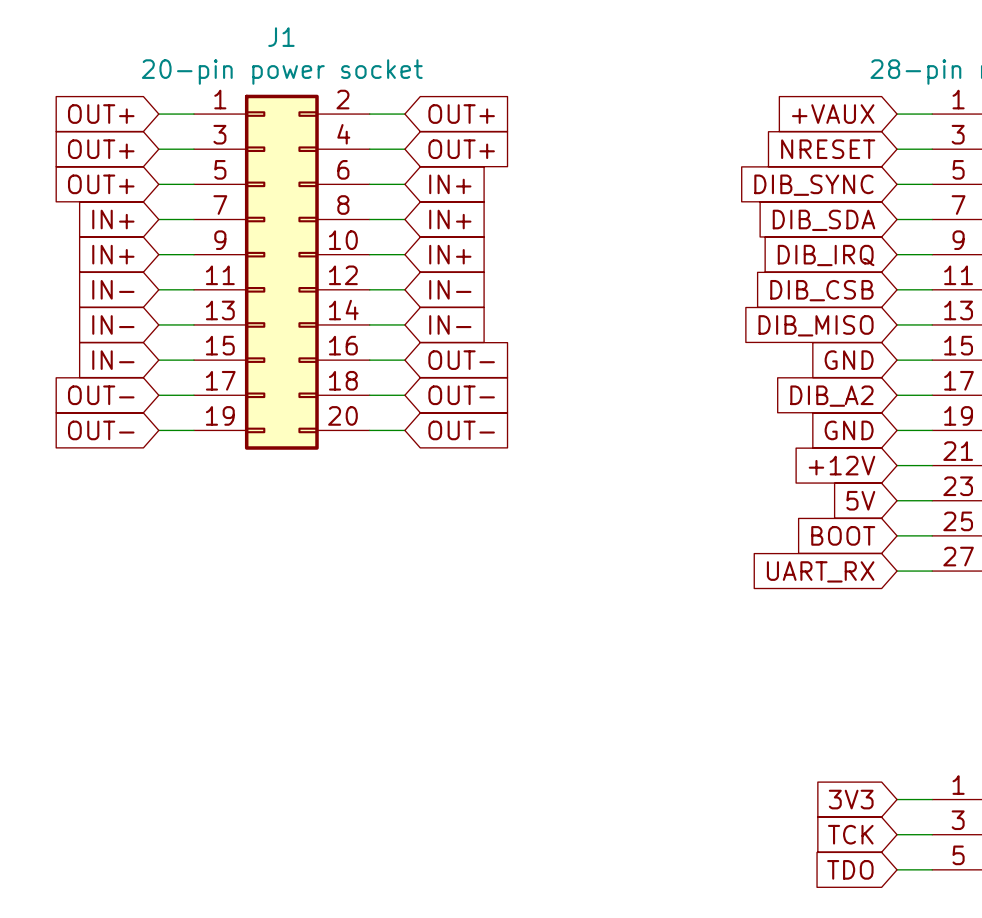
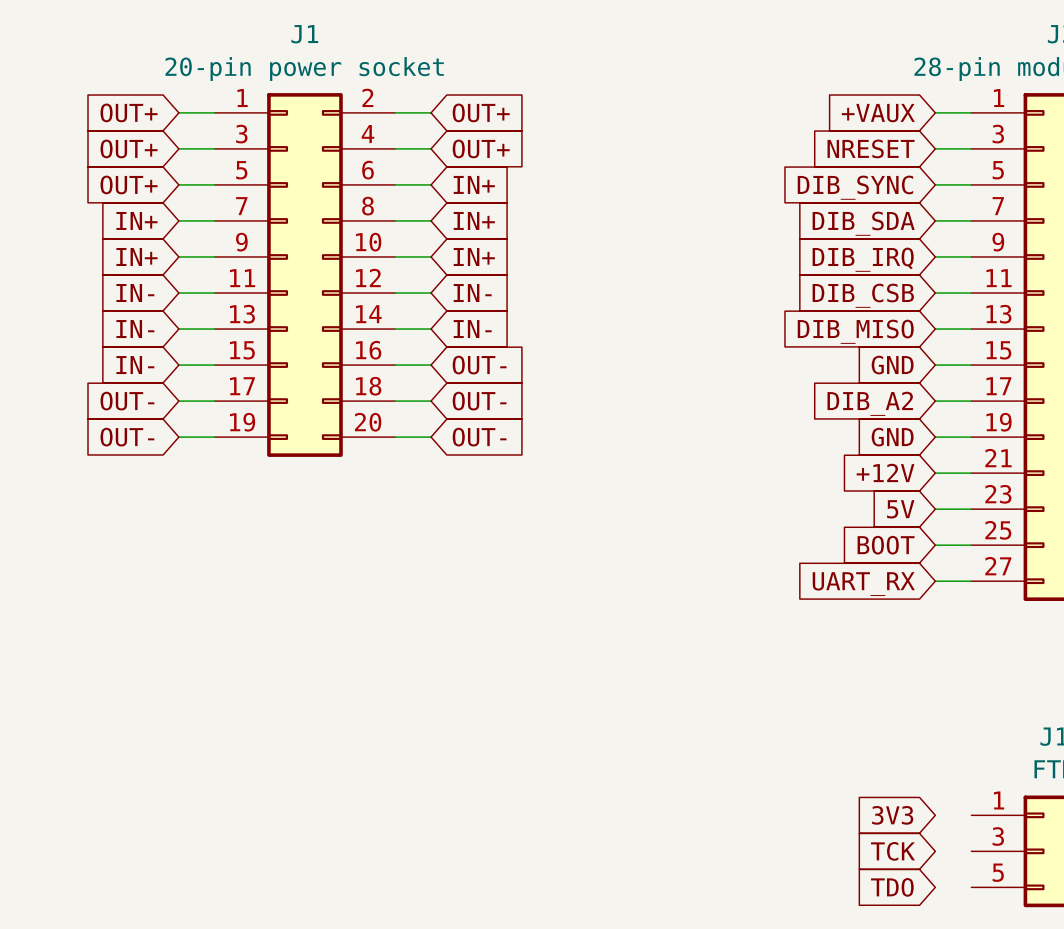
wire: (897, 799) (932, 799) -> none
wire: (897, 834) (932, 834) -> none
wire: (897, 869) (932, 869) -> none

